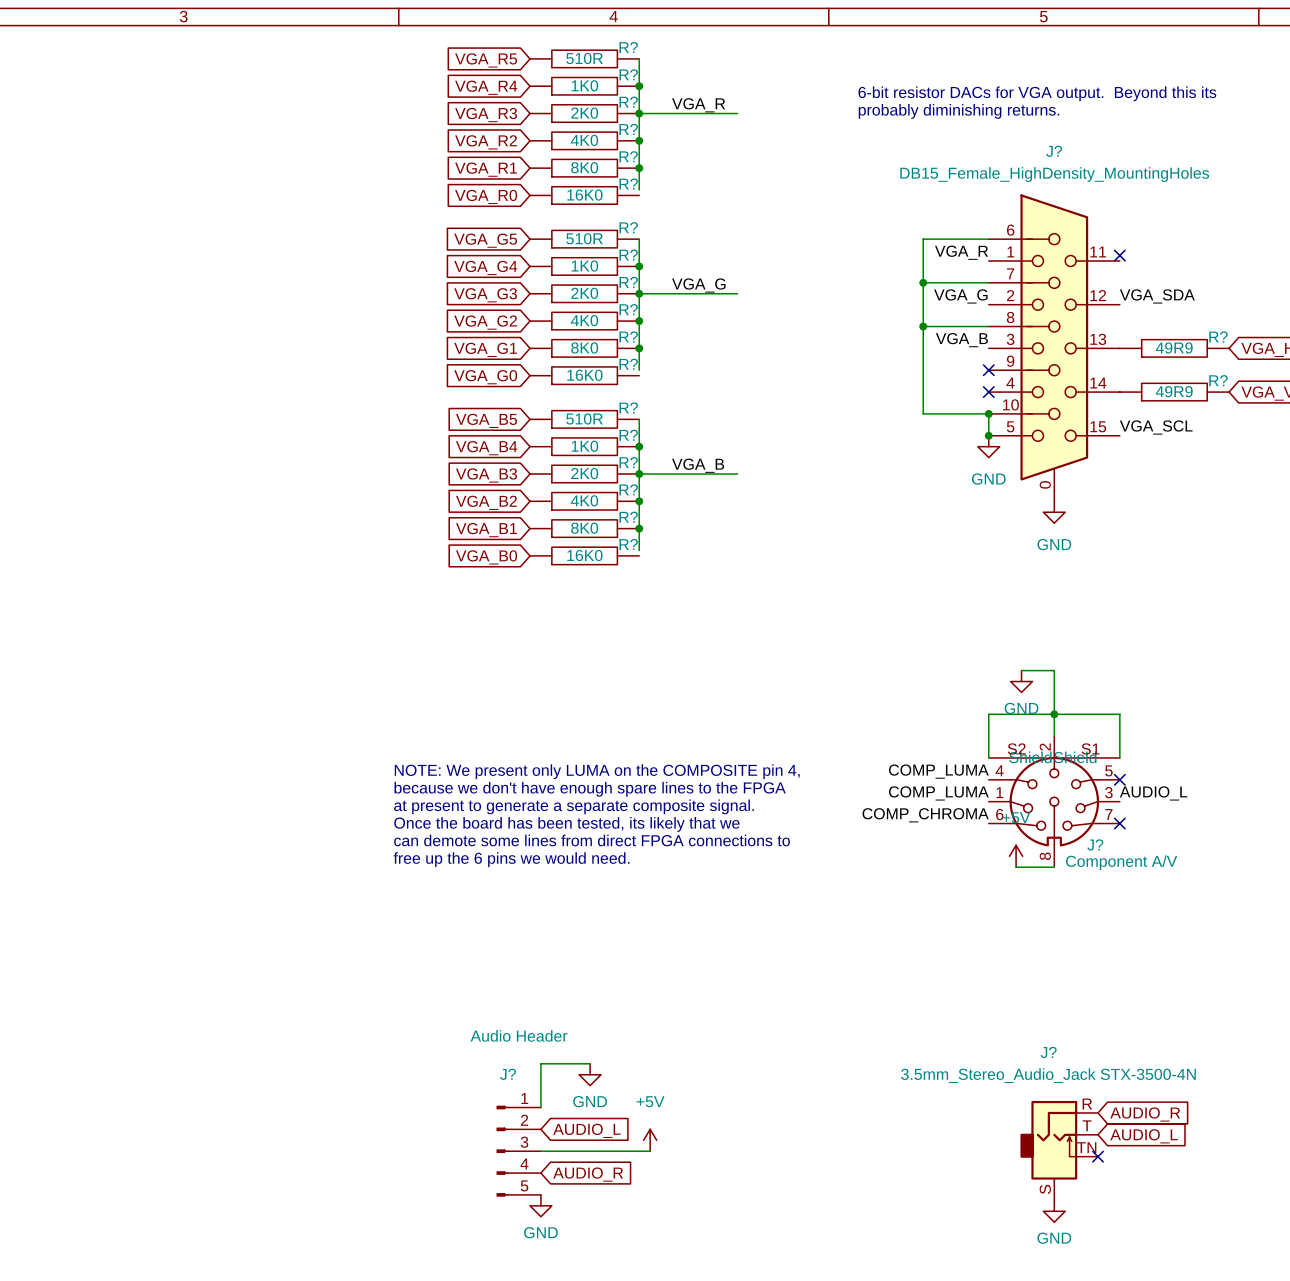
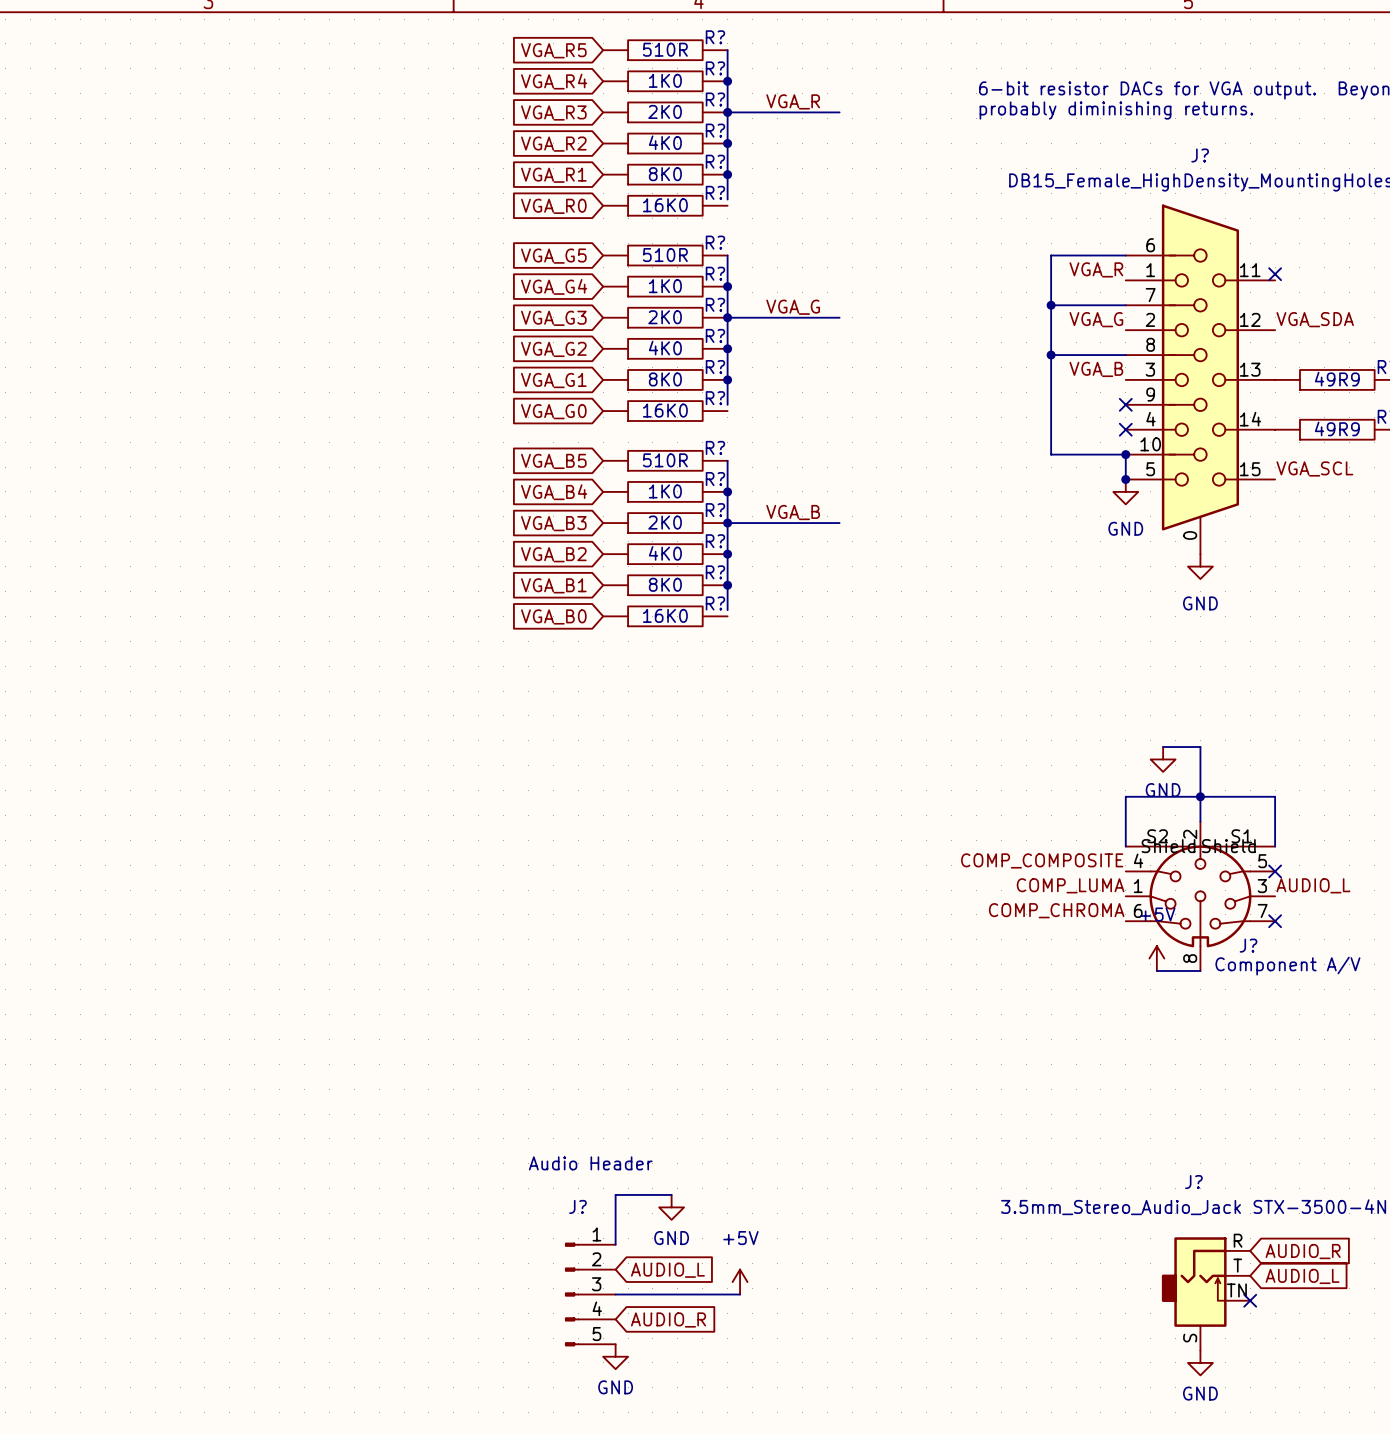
text: NOTE: We present only LUMA on the COMPOSITE pin 4, (597, 771) -> none
label: COMP_LUMA (938, 771) -> COMP_COMPOSITE (1042, 860)
text: because we don't have enough spare lines to the FPGA (590, 789) -> none
text: at present to generate a separate composite signal. (574, 806) -> none
text: Once the board has been tested, its likely that we (566, 824) -> none
text: can demote some lines from direct FPGA connections to (592, 840) -> none
text: free up the 6 pins we would need. (511, 859) -> none

